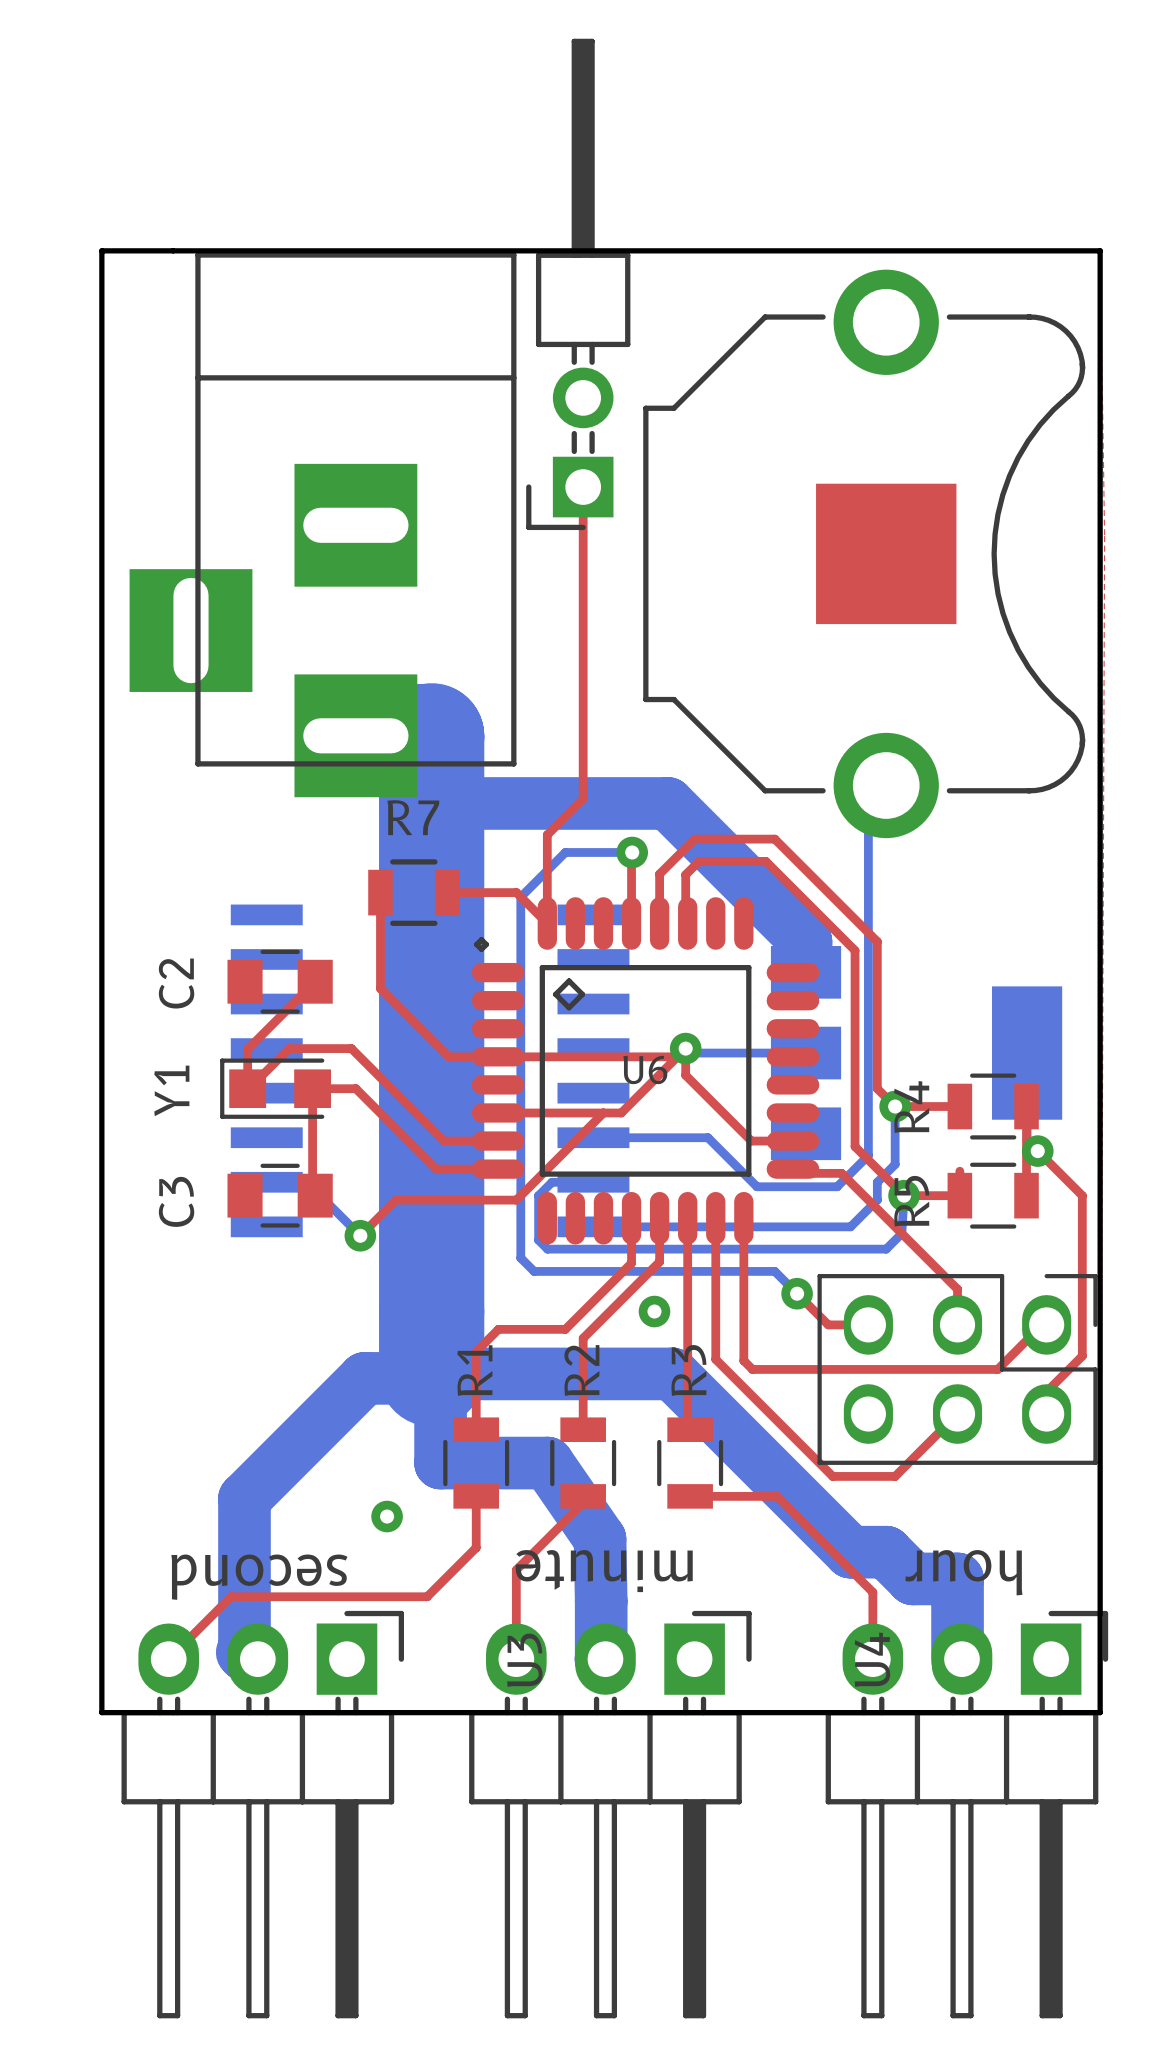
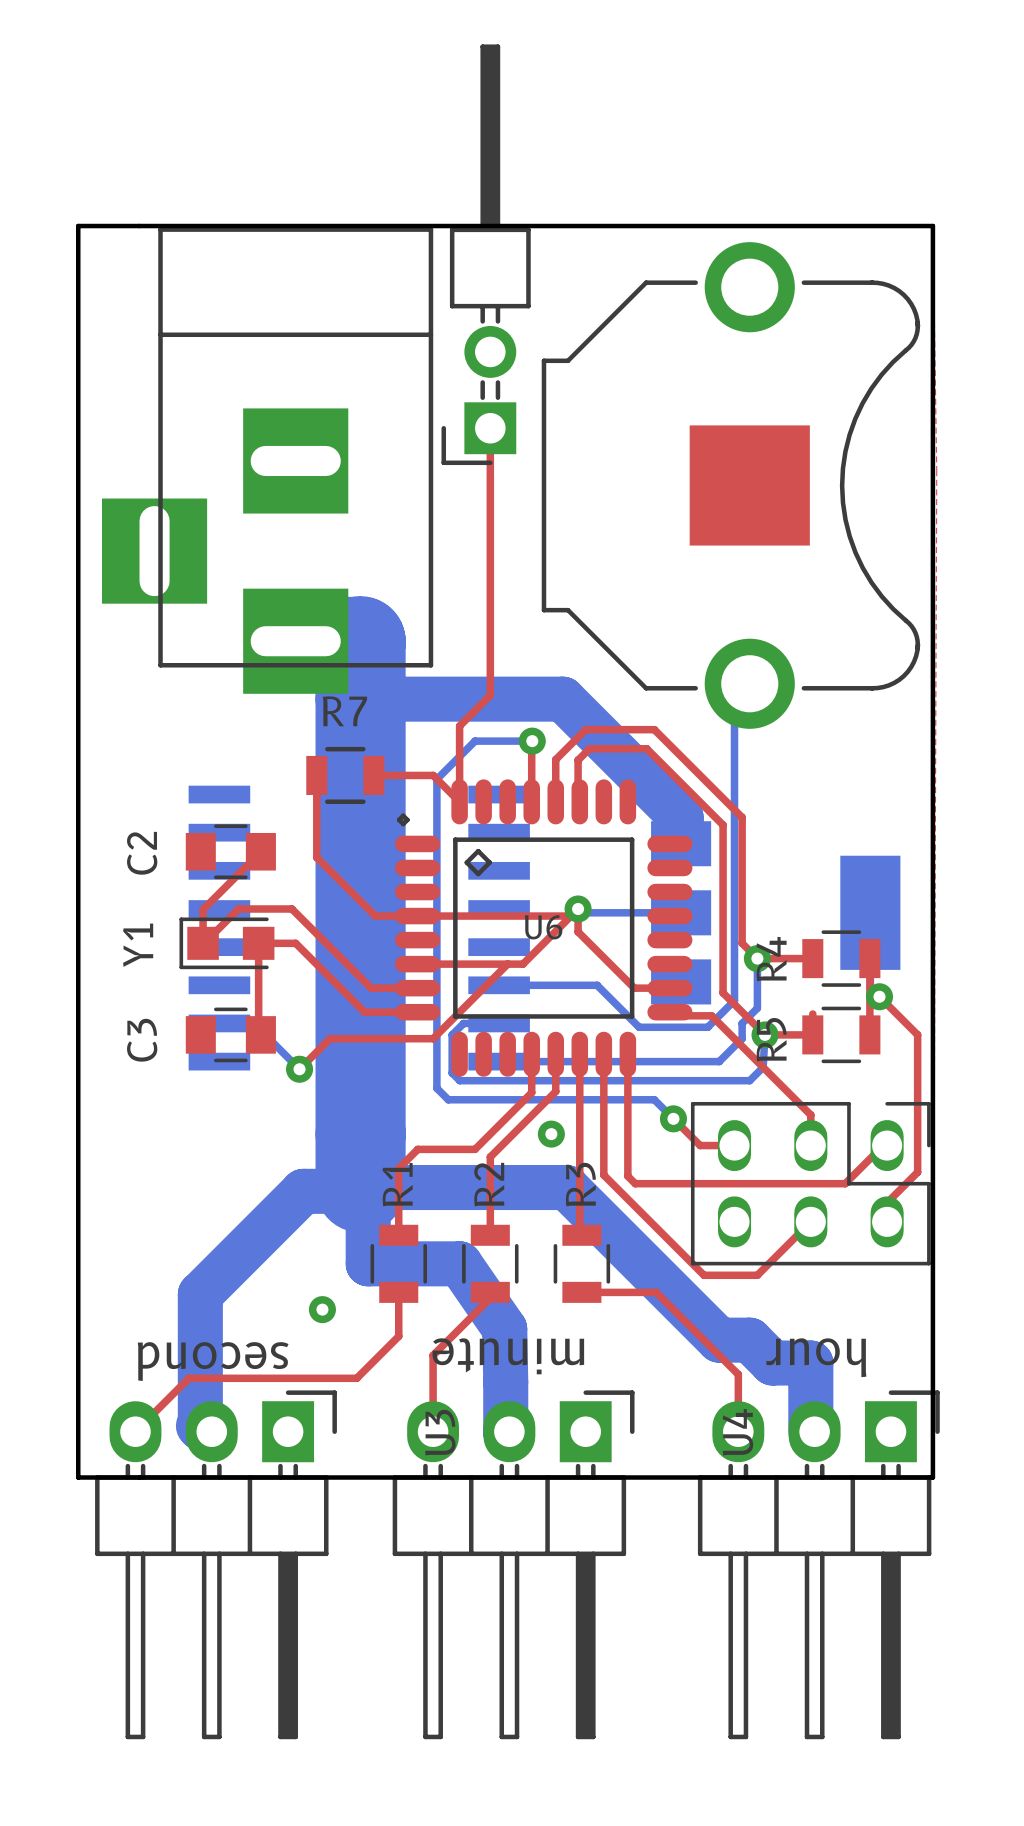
part footprint: [817, 1274, 1098, 1465] -> [690, 1101, 931, 1266]

